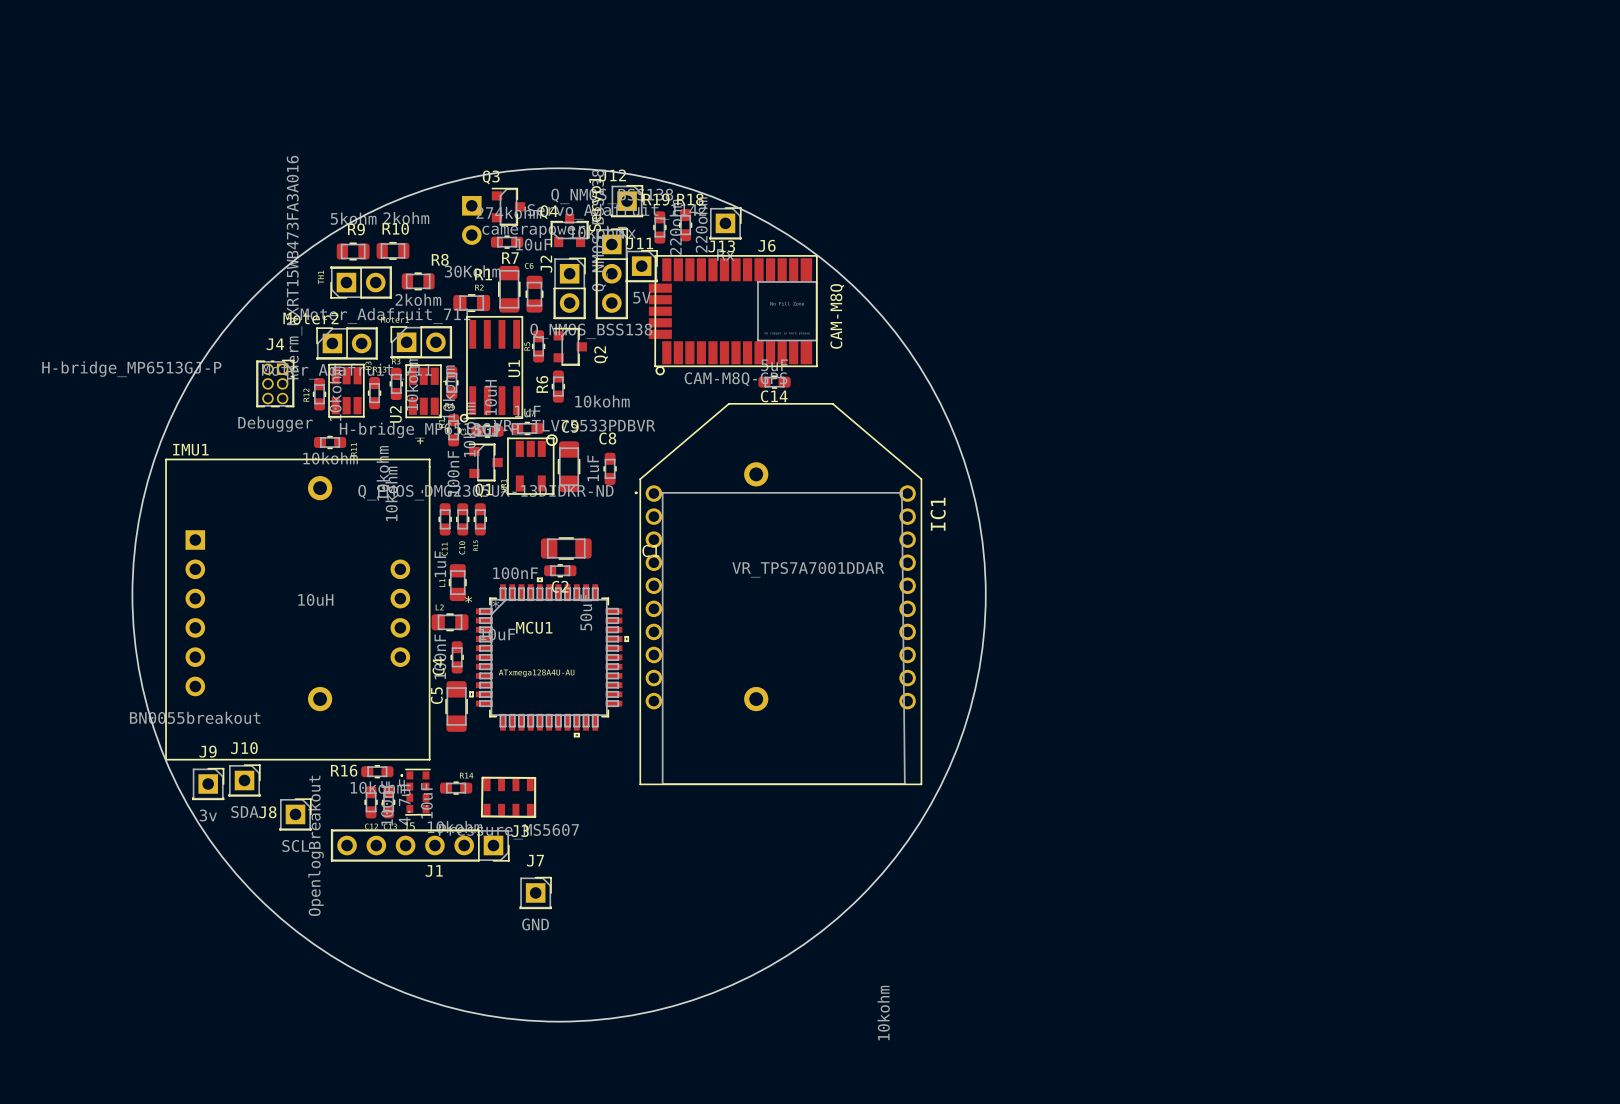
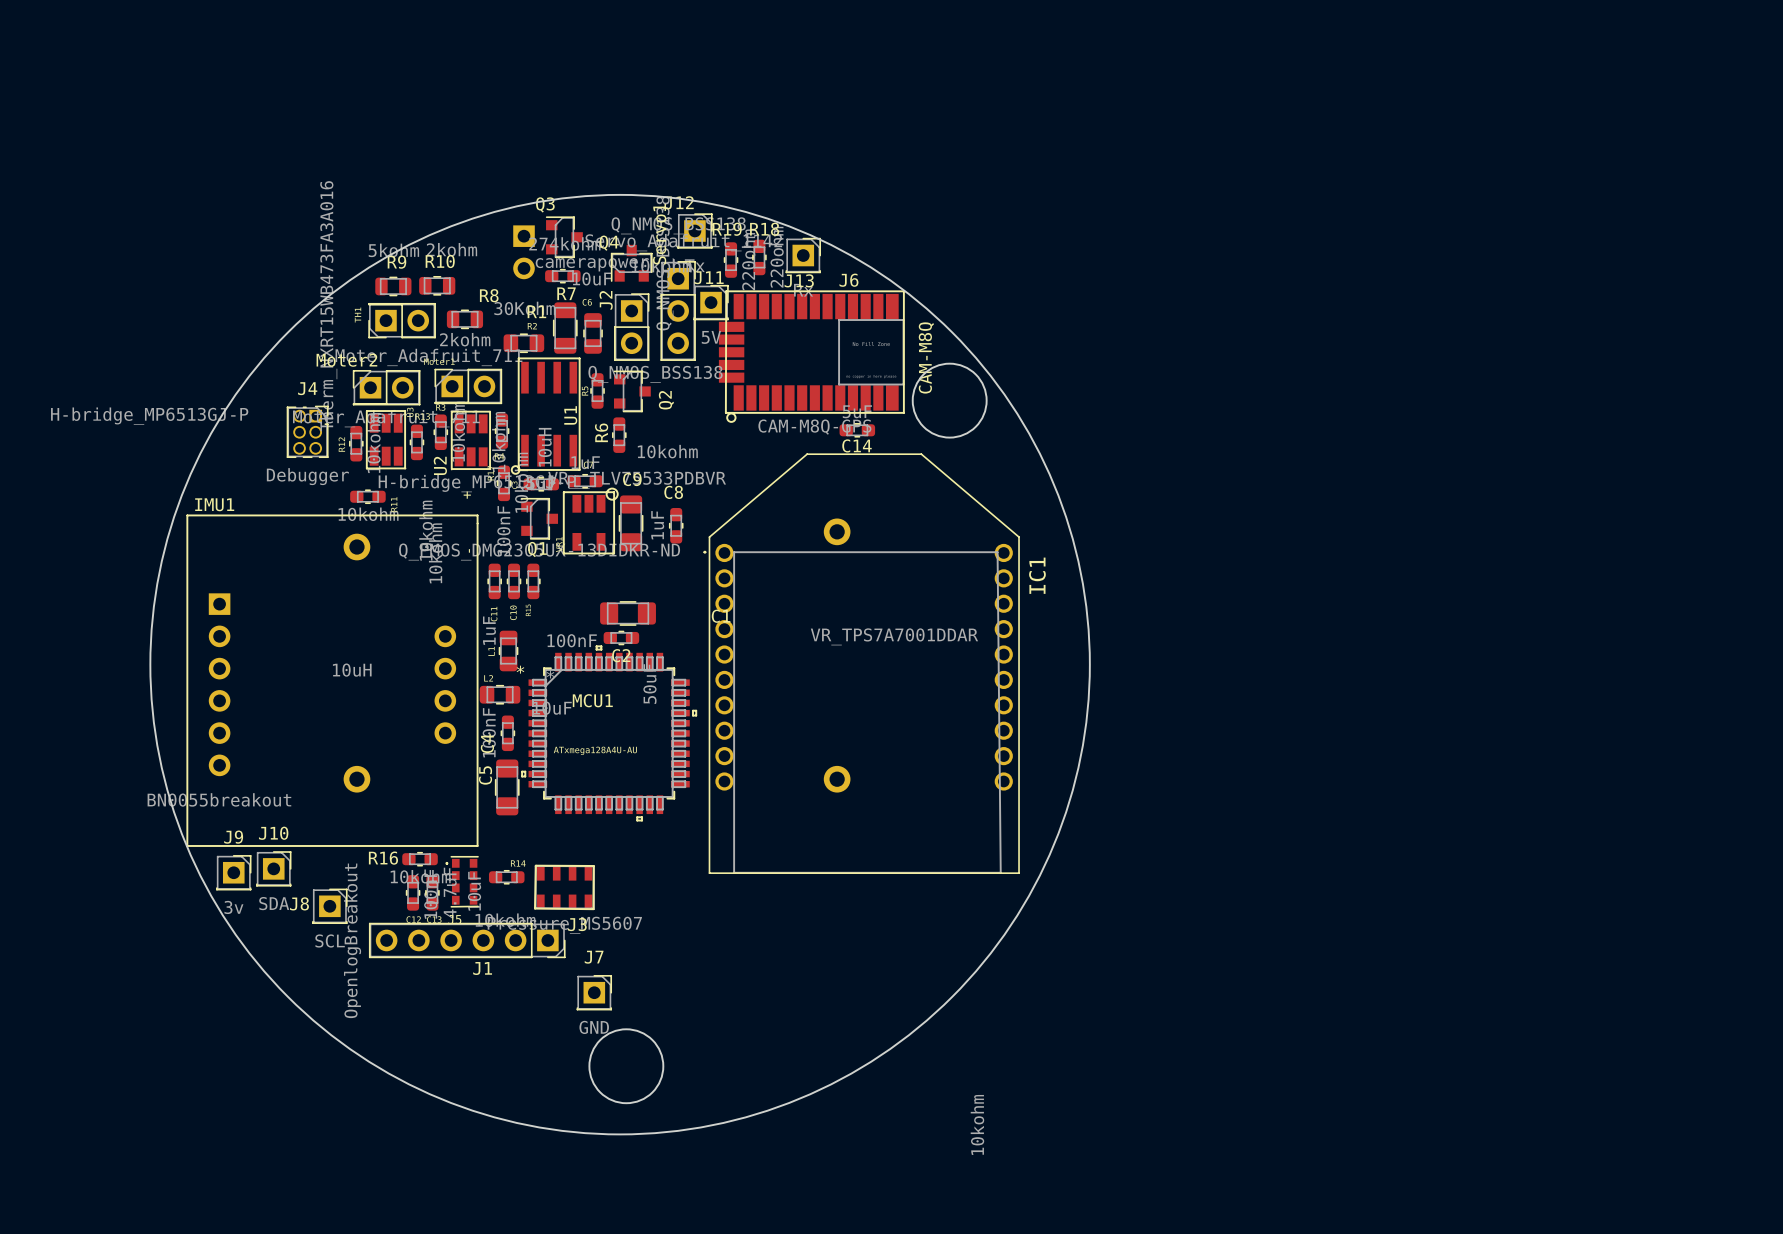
round board edge: none -> [911, 362, 988, 439]
round board edge: none -> [588, 1028, 665, 1105]

